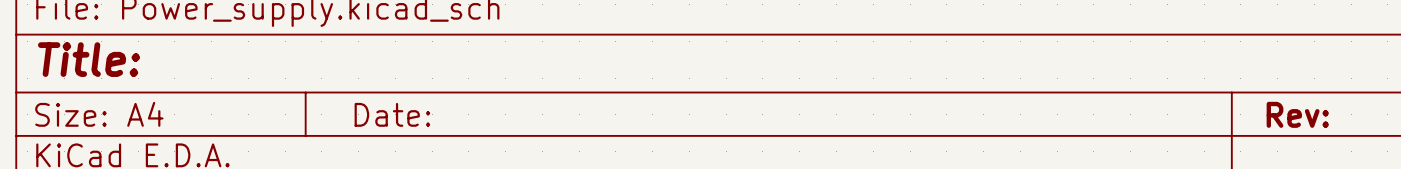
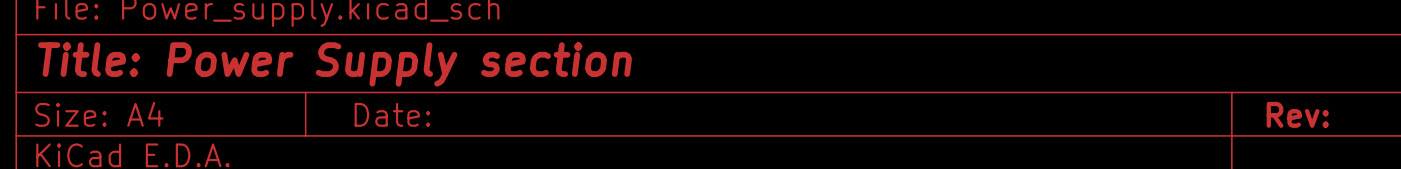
title block: Title: (89, 59) -> Title: Power Supply section (334, 64)

